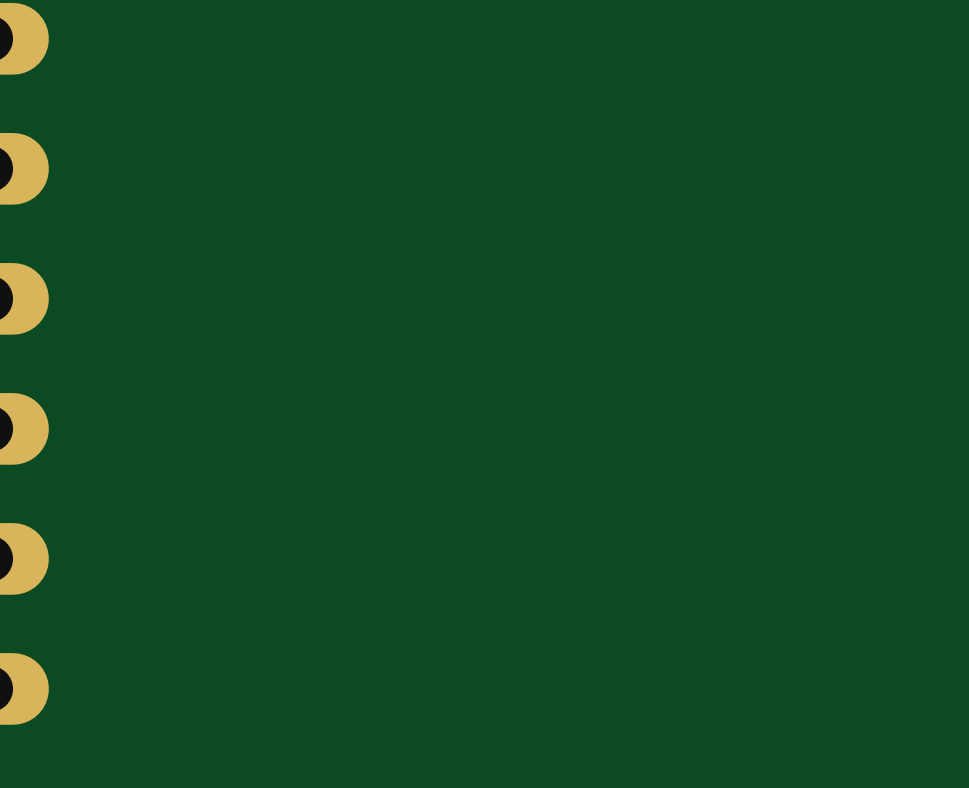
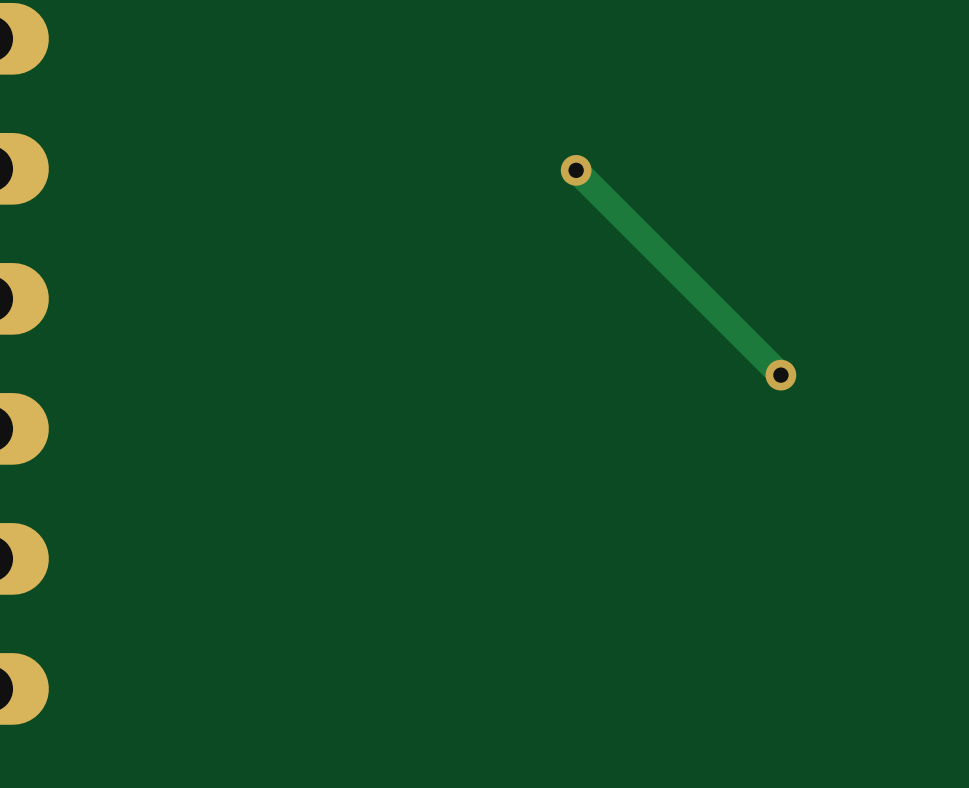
track: none -> (576, 170) (780, 375)
via: none -> (576, 170)
via: none -> (780, 375)

